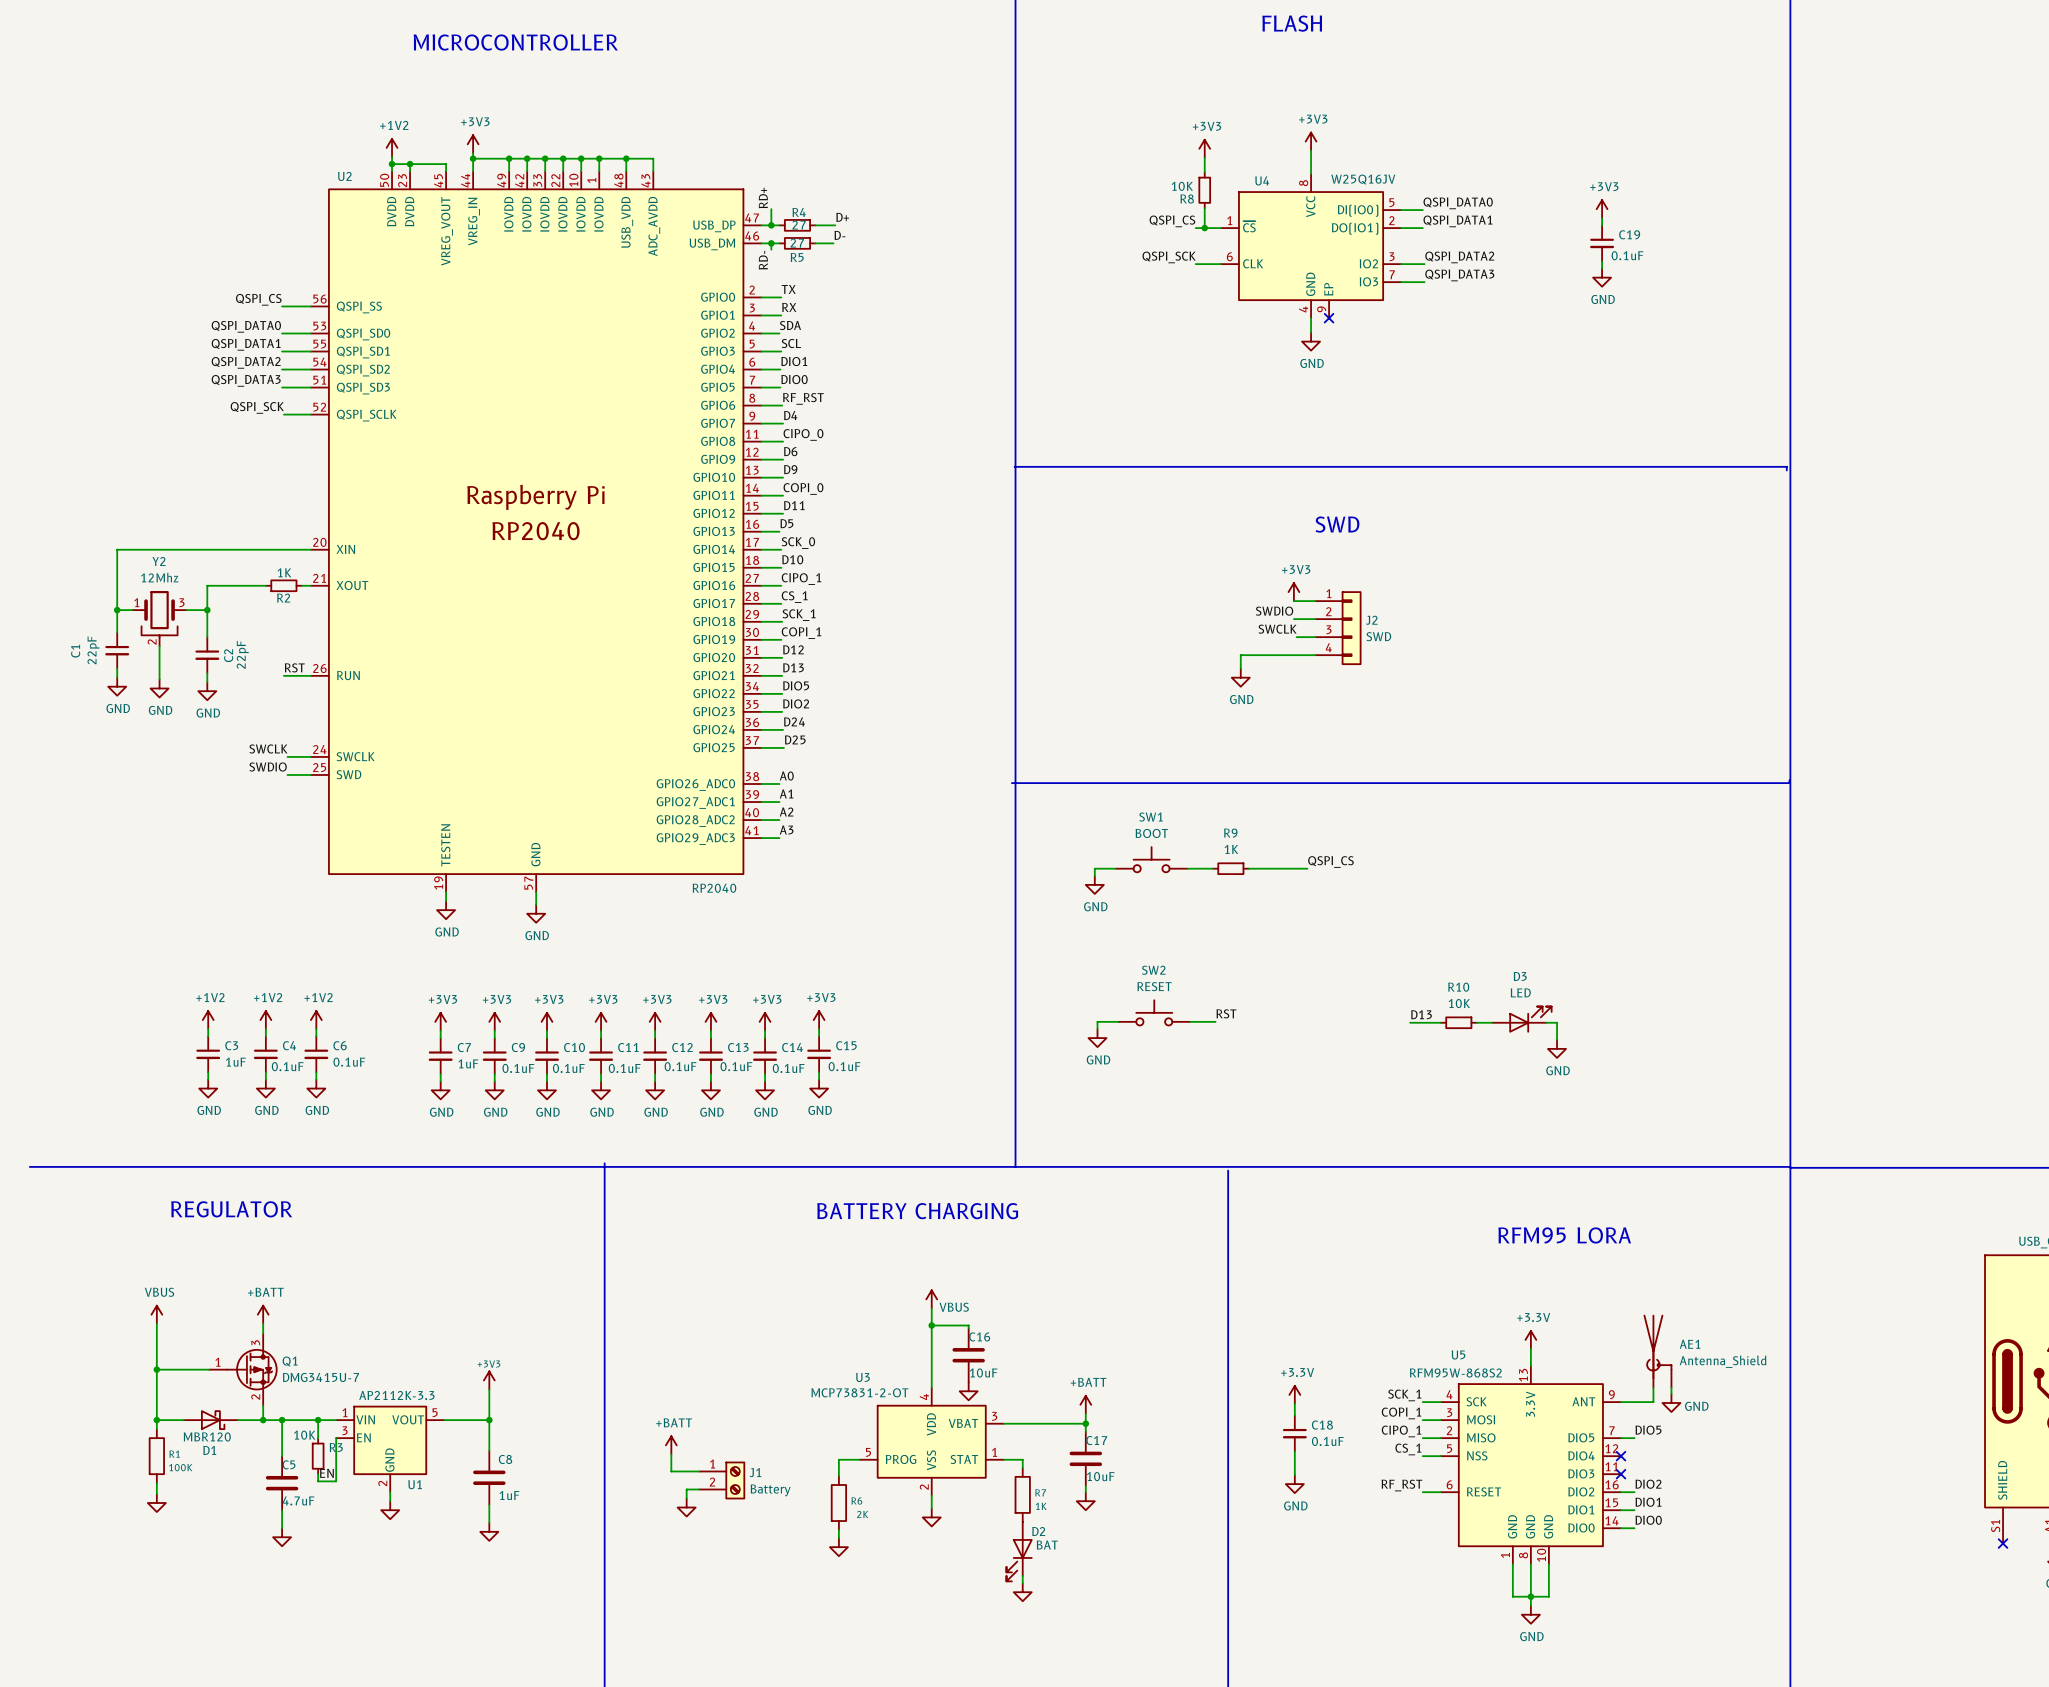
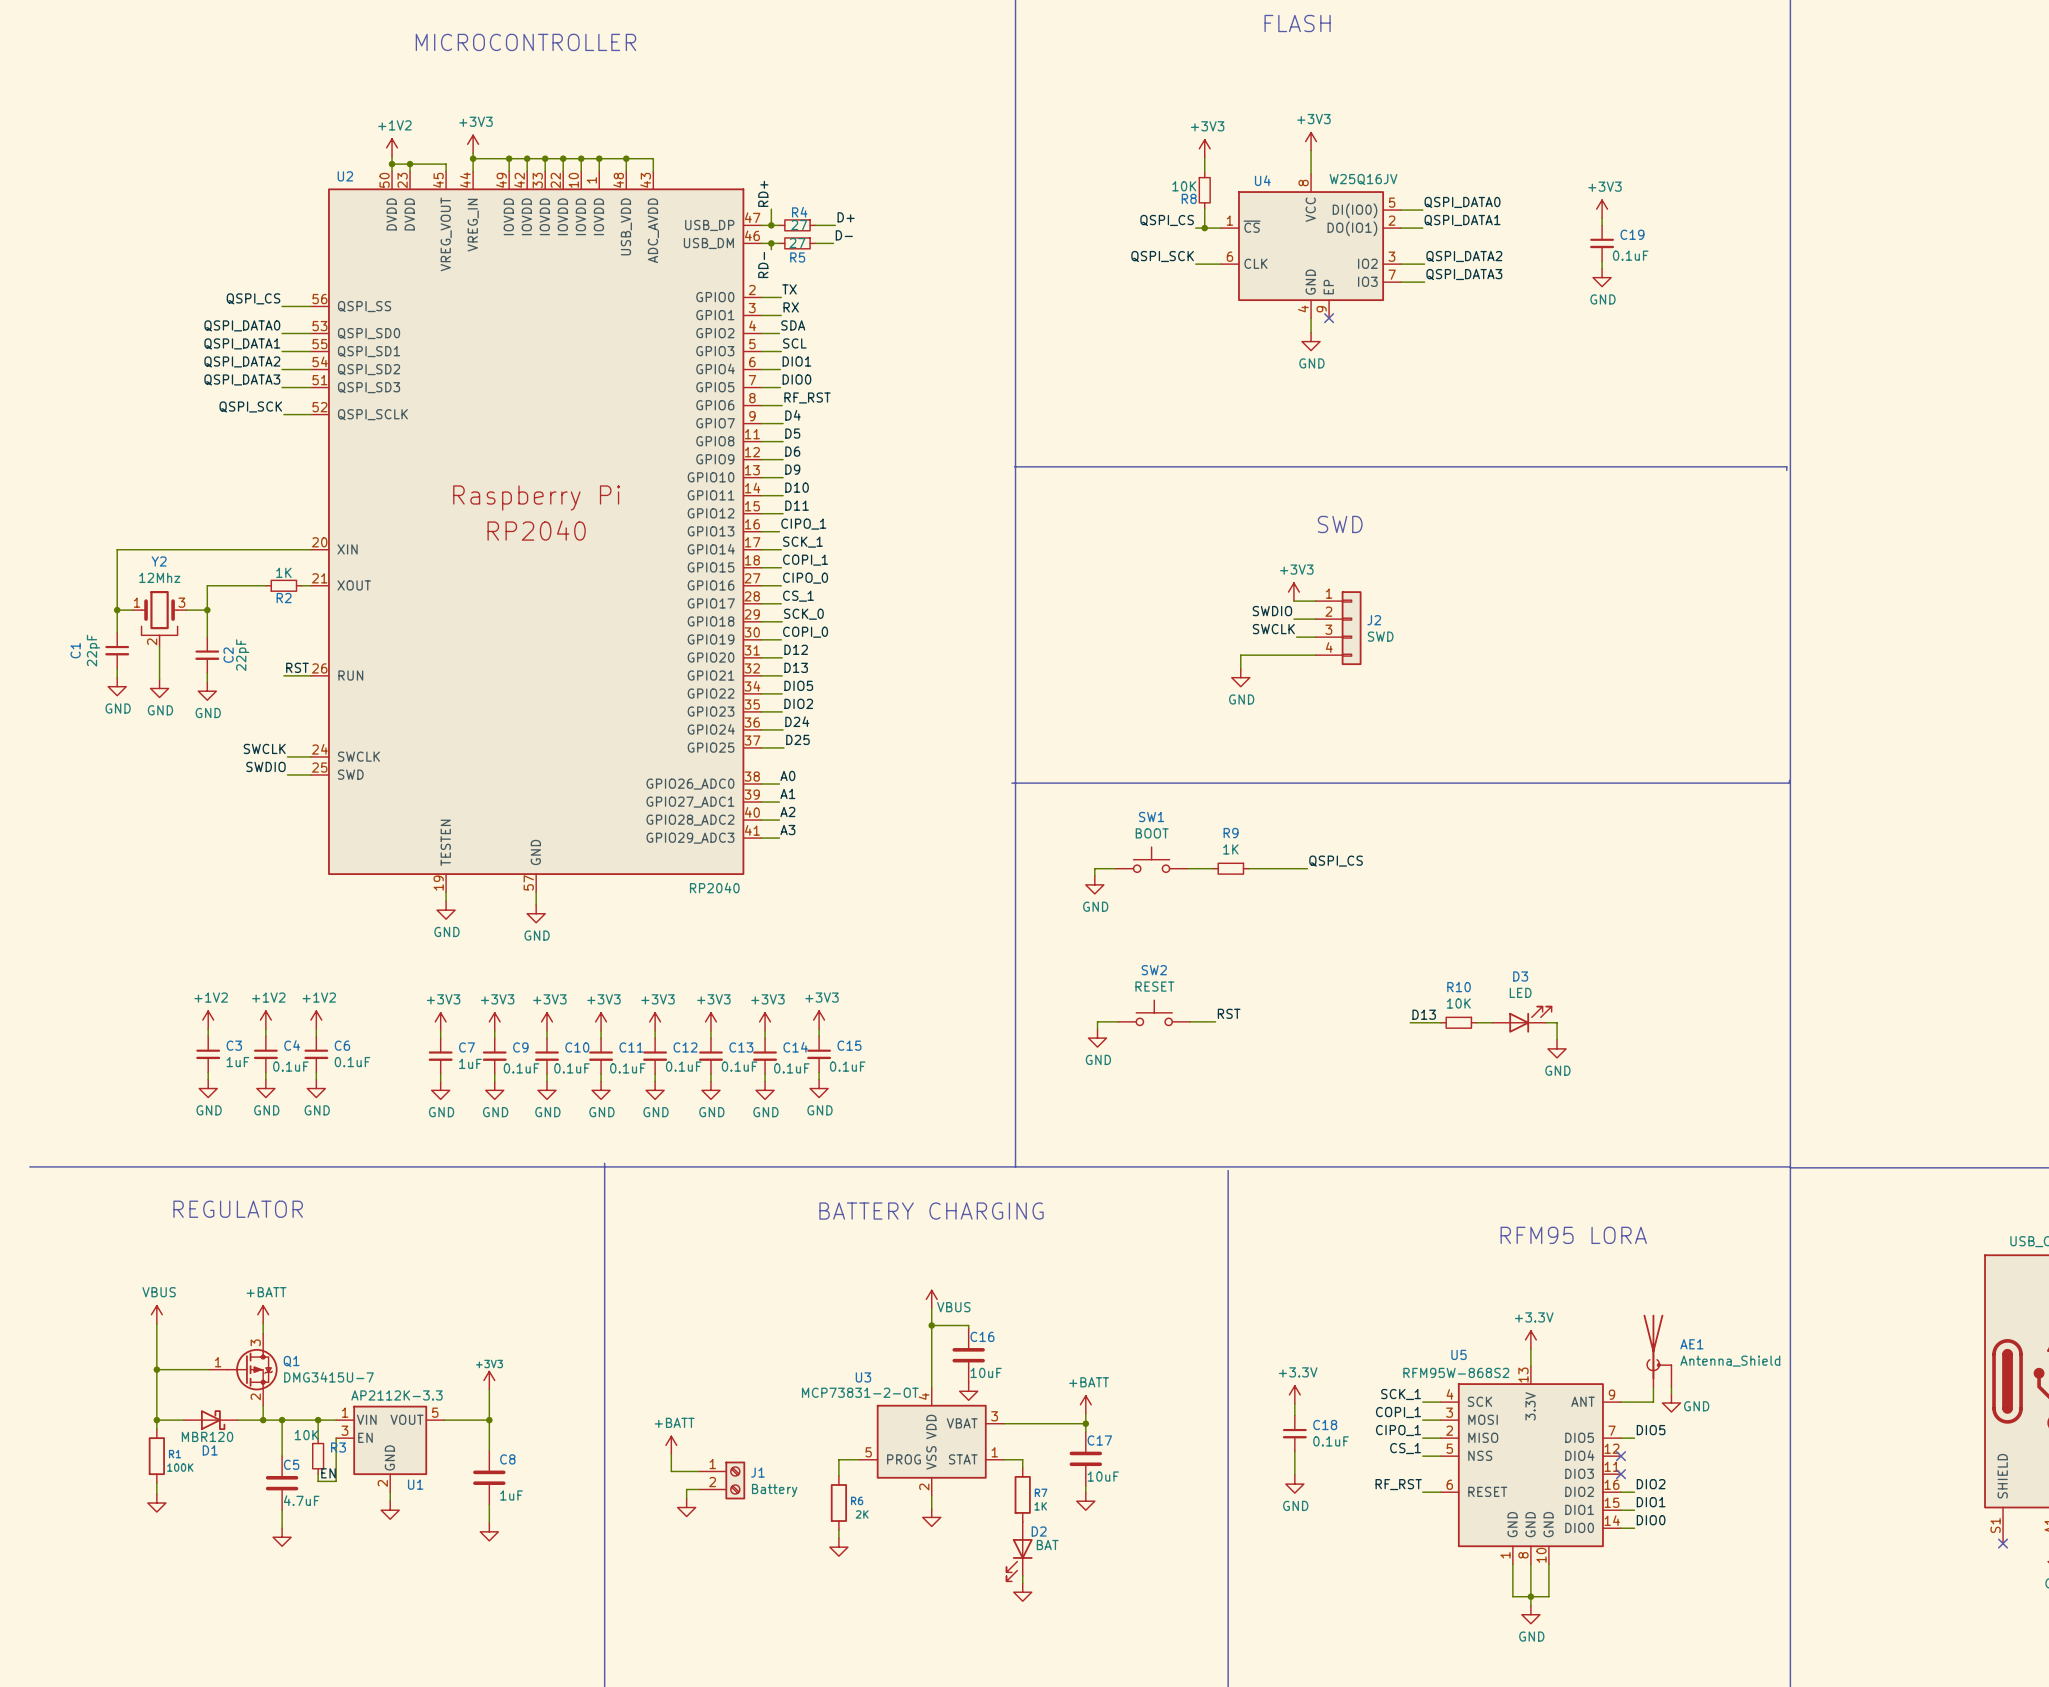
label: CIPO_0 (803, 434) -> D5 (792, 433)
label: COPI_0 (803, 488) -> D10 (797, 487)
label: D5 (786, 523) -> CIPO_1 (803, 524)
label: SCK_0 (798, 543) -> SCK_1 (802, 542)
label: D10 (792, 559) -> COPI_1 (805, 560)
label: CIPO_1 (801, 579) -> CIPO_0 (805, 578)
label: SCK_1 (799, 615) -> SCK_0 (803, 614)
label: COPI_1 (801, 633) -> COPI_0 (805, 632)

